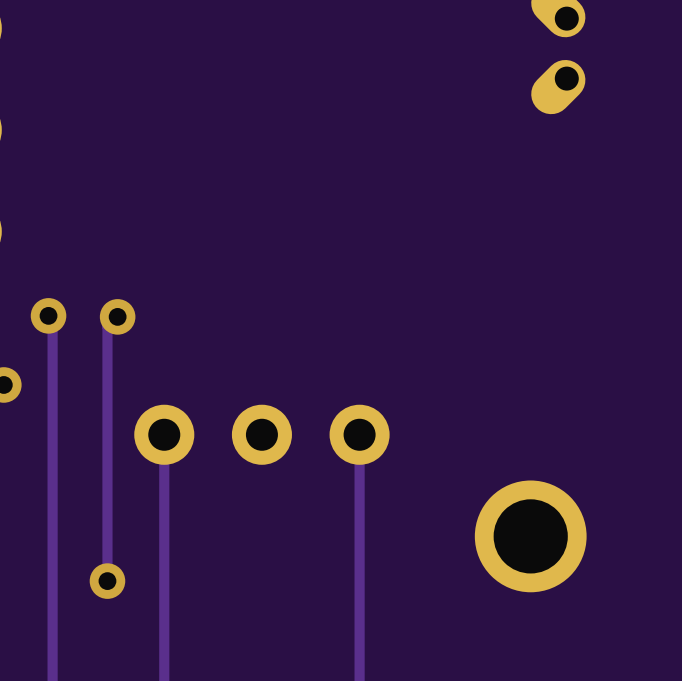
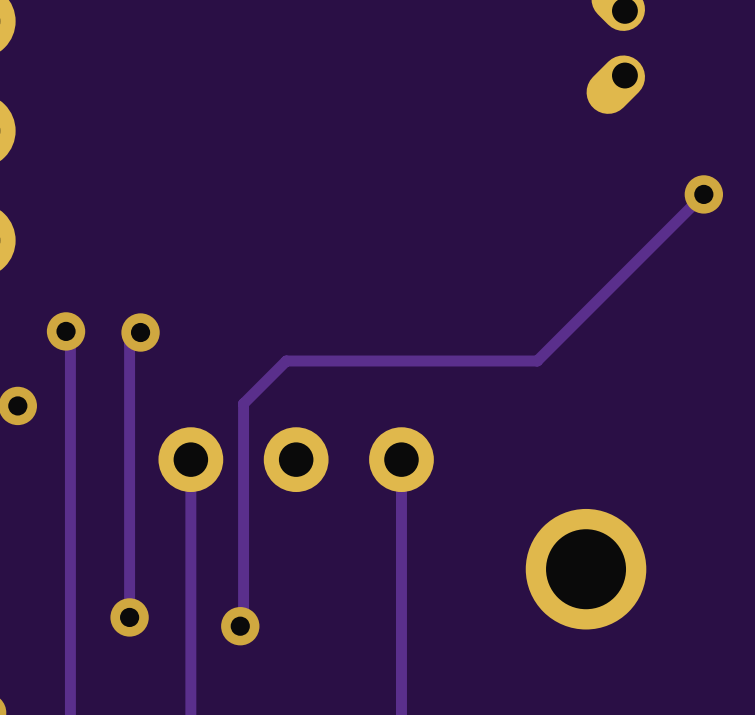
track: none -> (703, 194) (537, 361) (286, 361) (243, 403) (243, 622) (240, 626)
via: none -> (703, 194)
via: none -> (240, 626)

